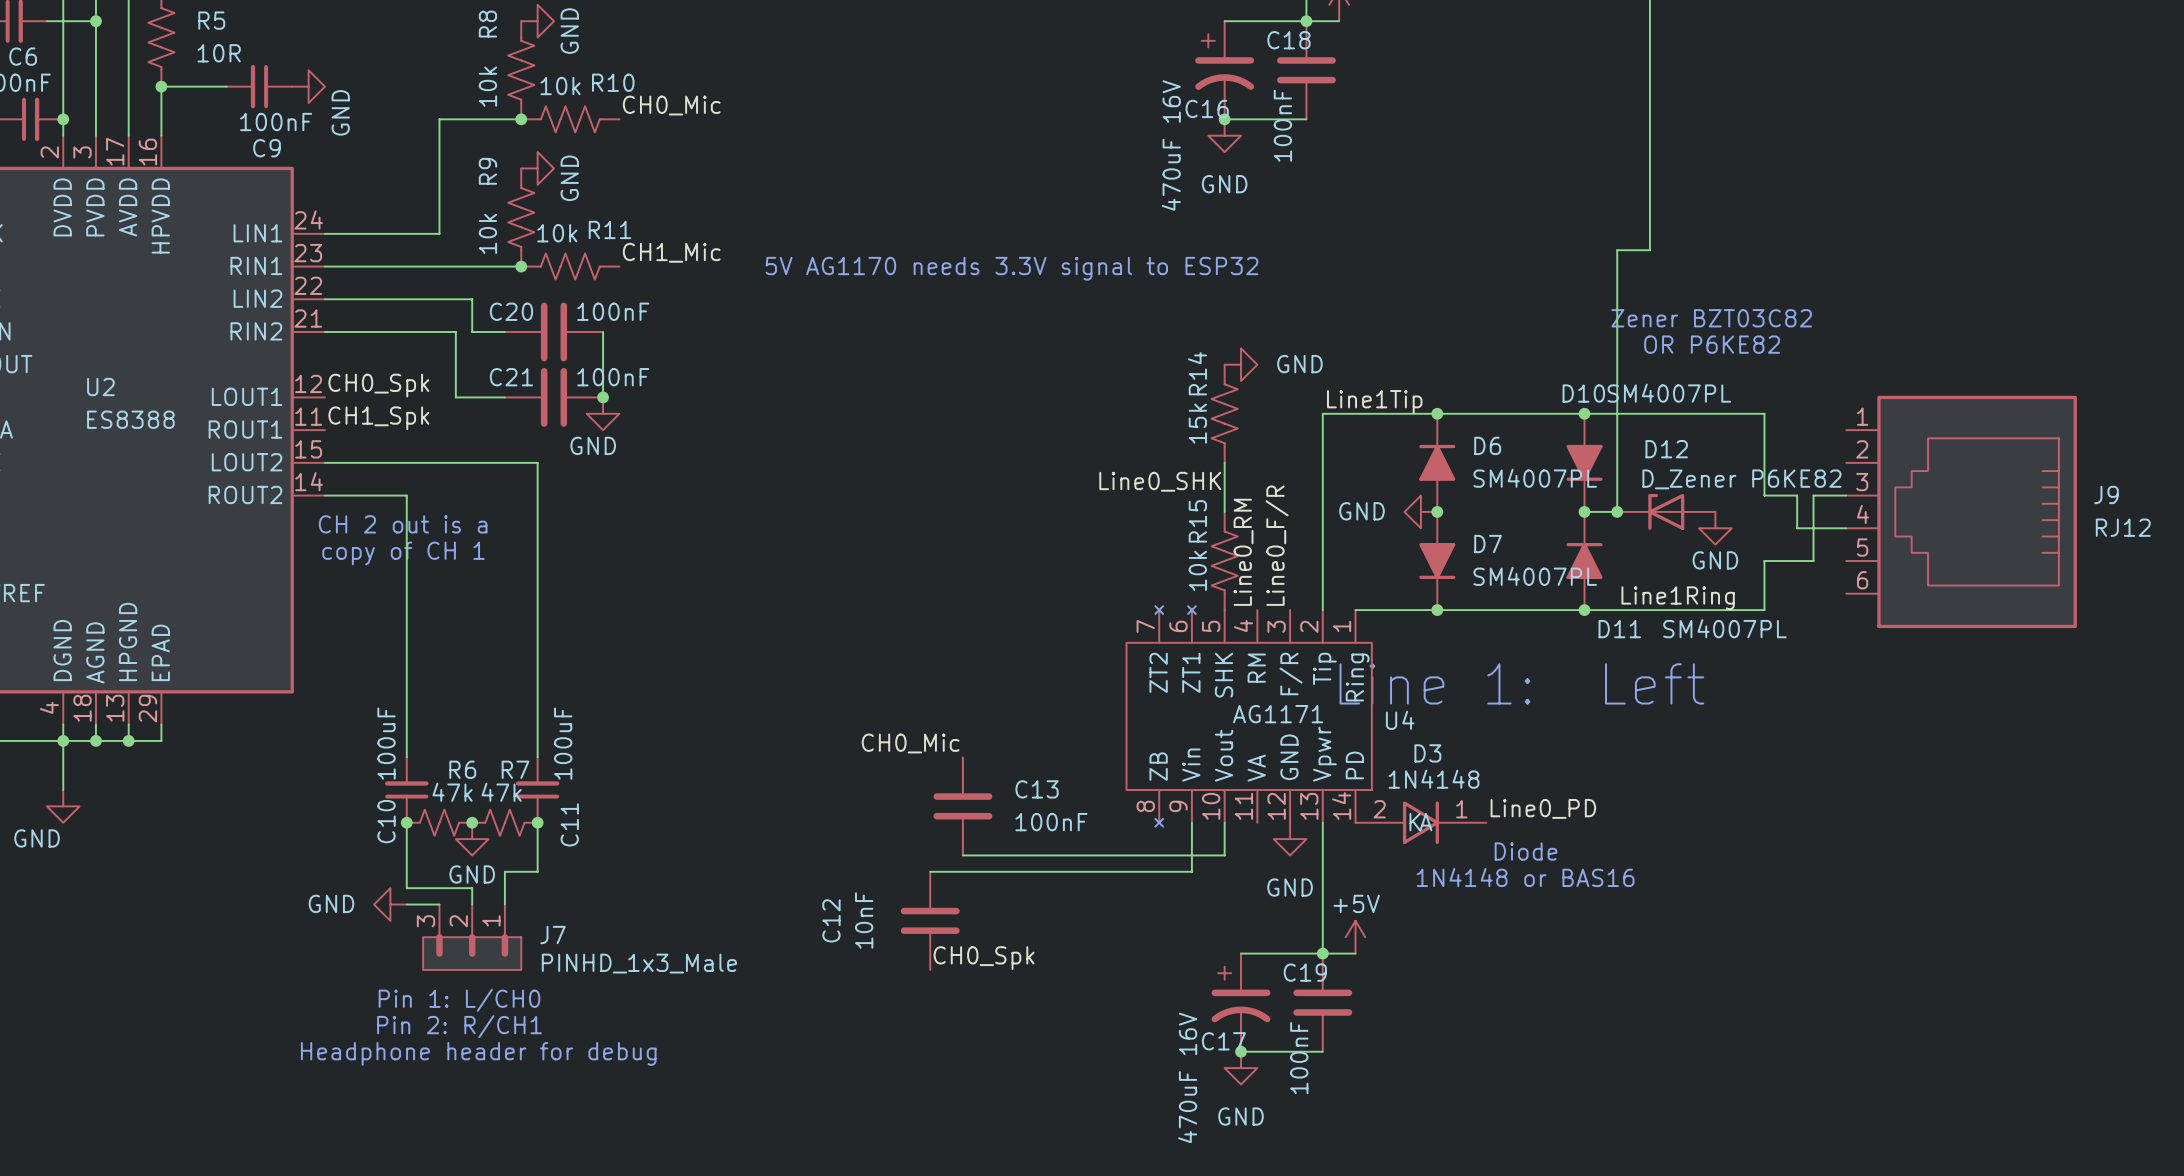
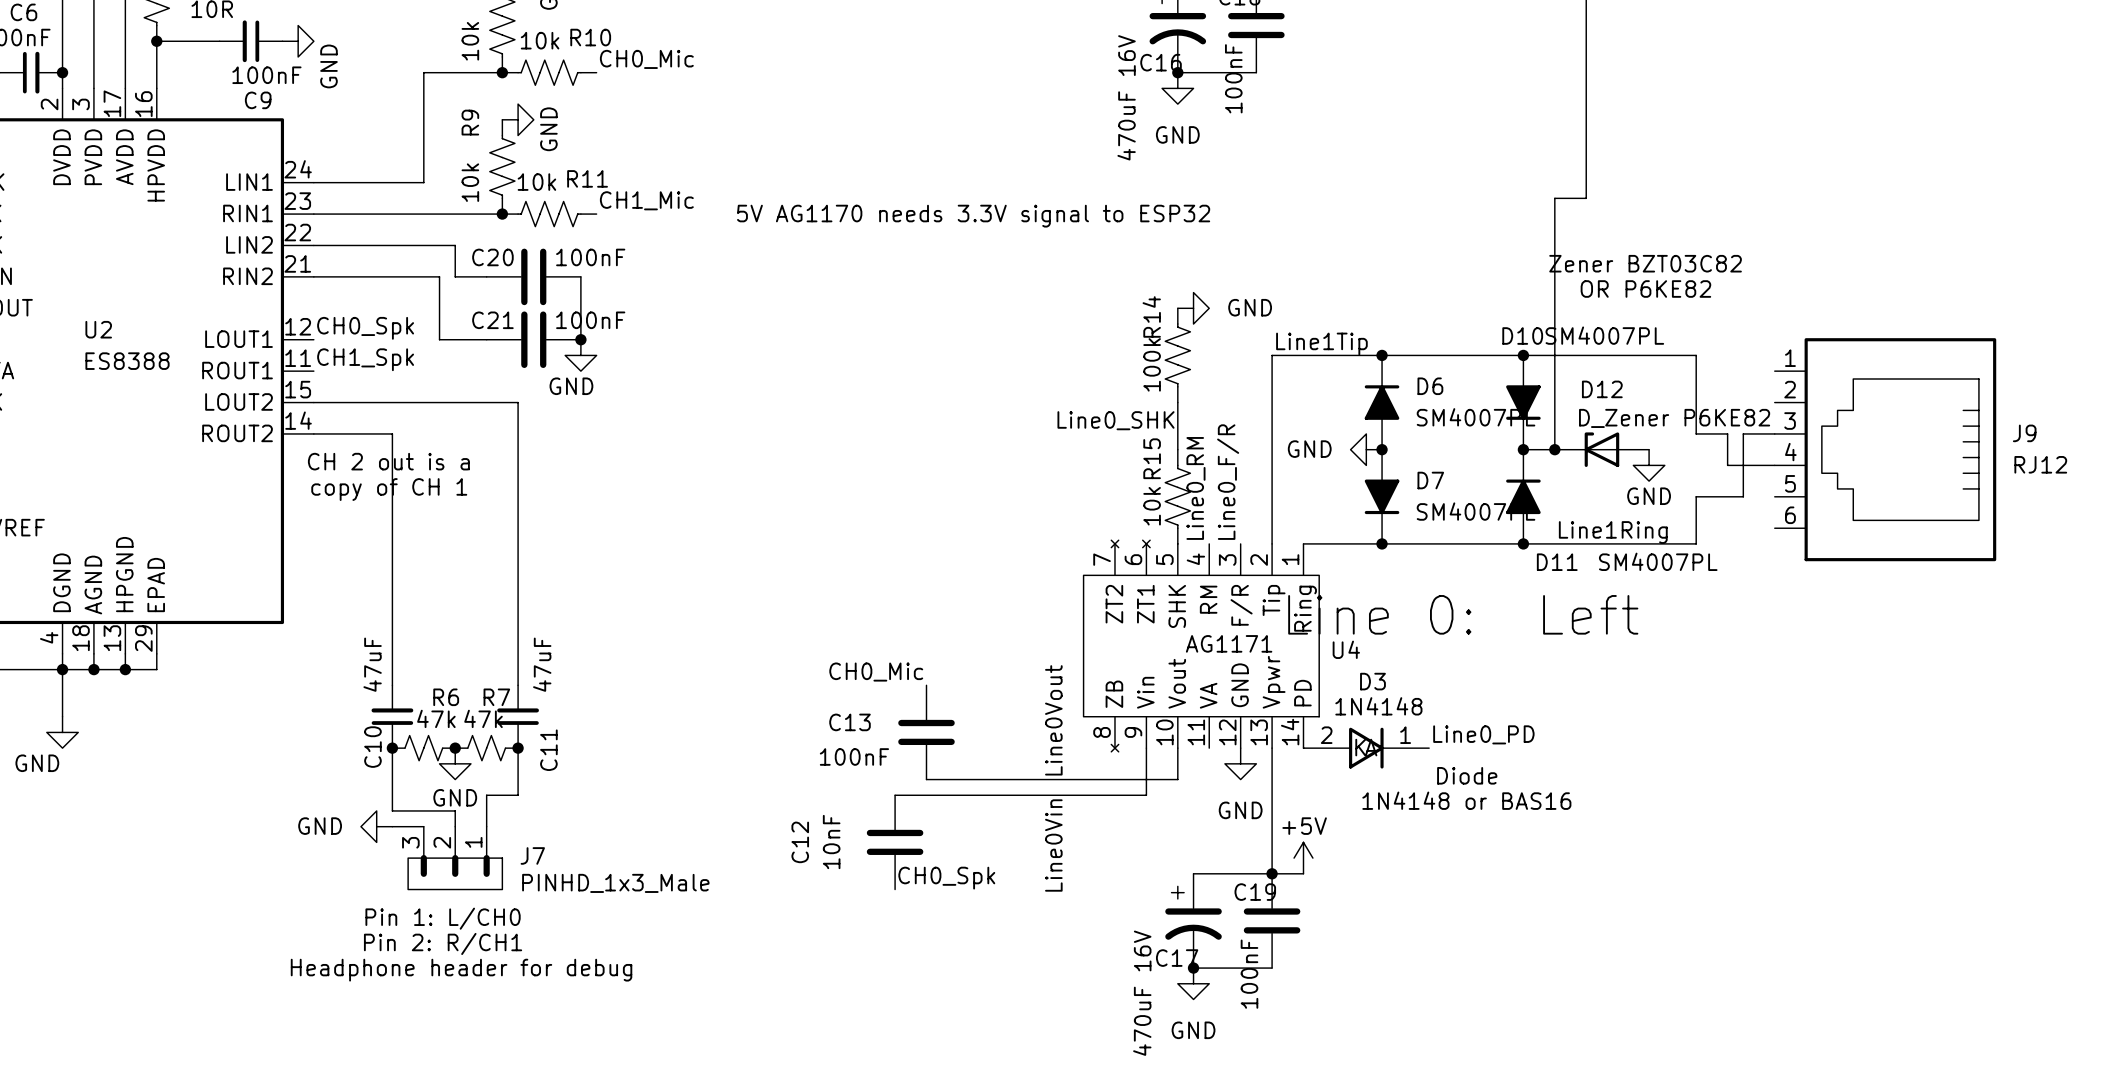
R14 value: 15k (1197, 423) -> 100k (1152, 364)
text: Line 1: Left (1521, 683) -> Line 0: Left (1463, 614)
C10 value: 100uF (386, 743) -> 47uF (372, 664)
C11 value: 100uF (563, 743) -> 47uF (542, 664)
C13 name position: C13 (1037, 789) -> C13 (850, 722)
label: none -> Line0Vout (1053, 720)
C13 value position: 100nF (1051, 822) -> 100nF (854, 756)
label: none -> Line0Vin (1053, 845)

